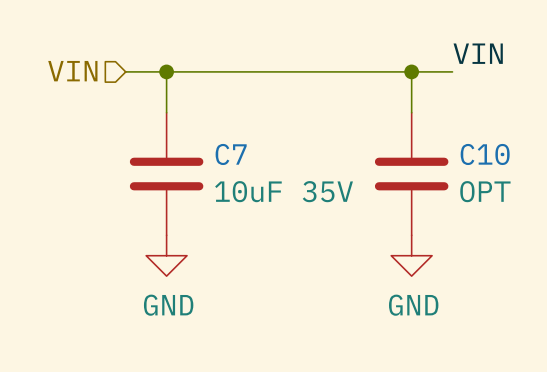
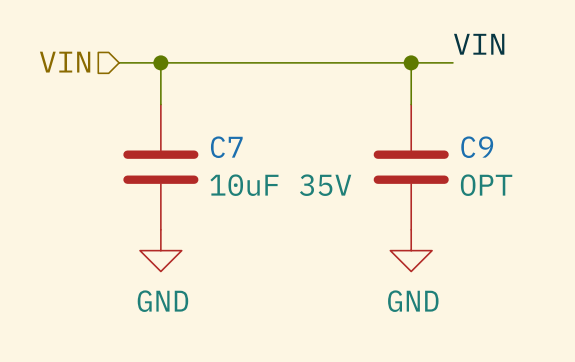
C10 name: C10 (485, 154) -> C9 (477, 147)

